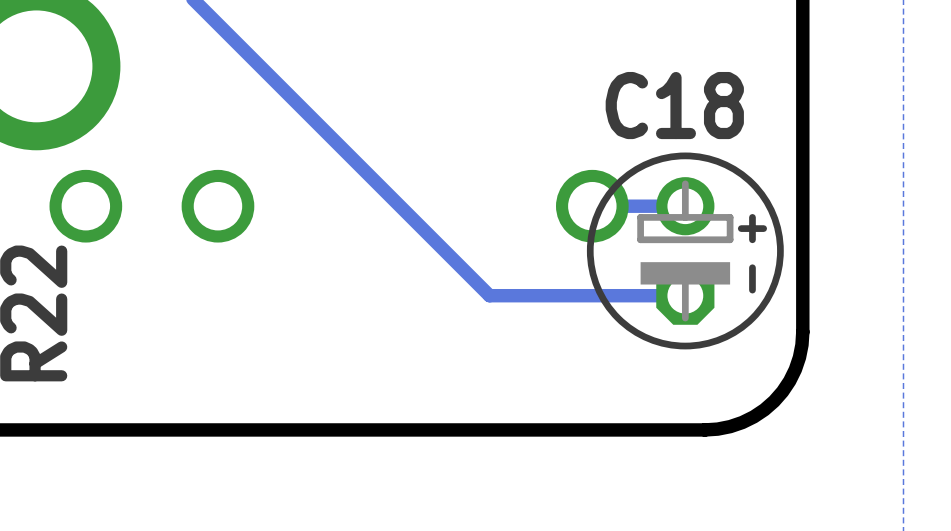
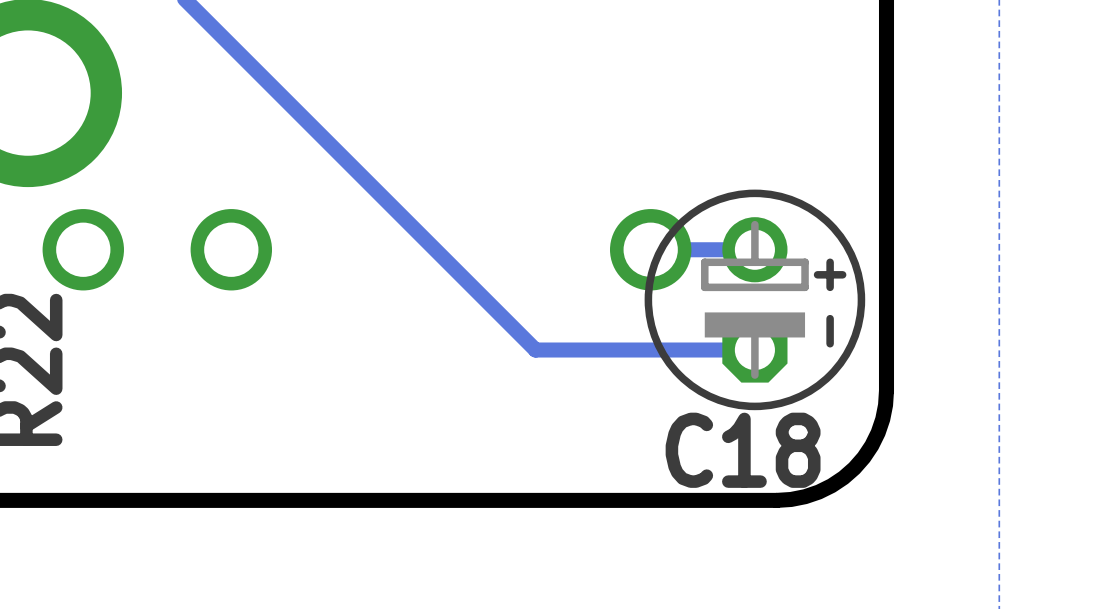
C18 name position: C18 (674, 105) -> C18 (743, 450)

